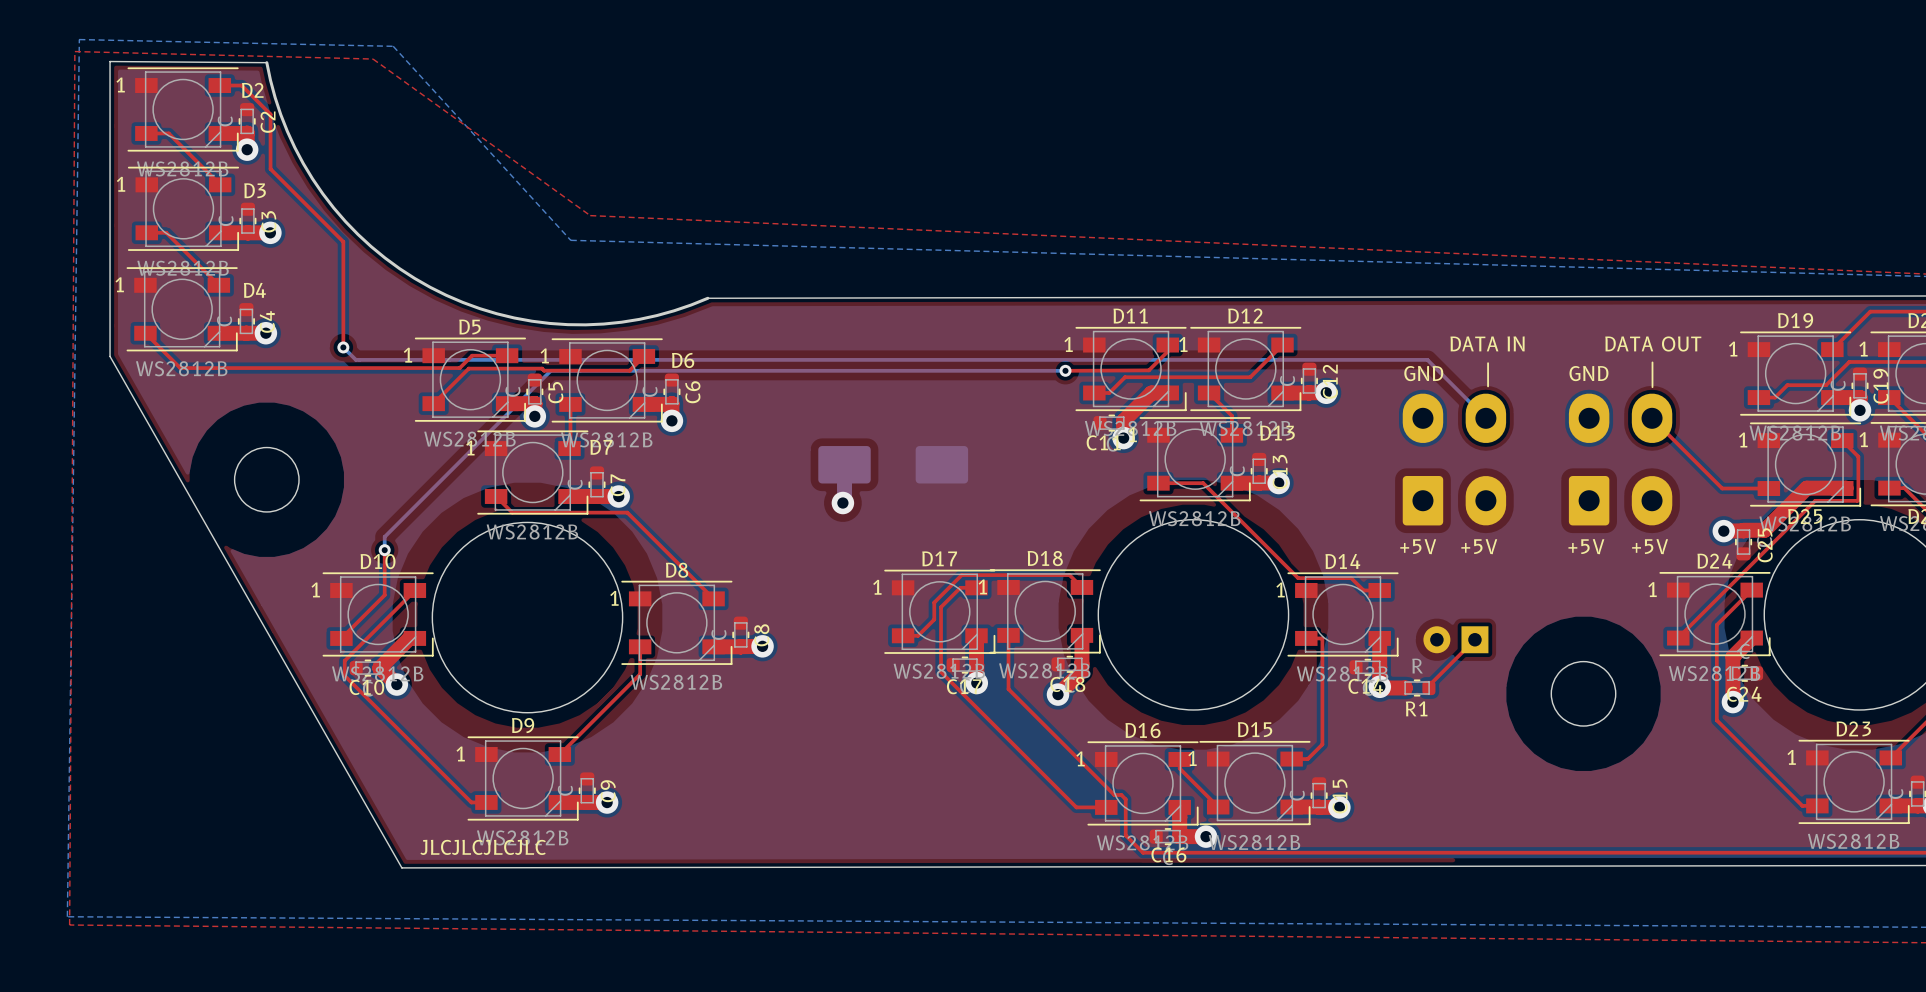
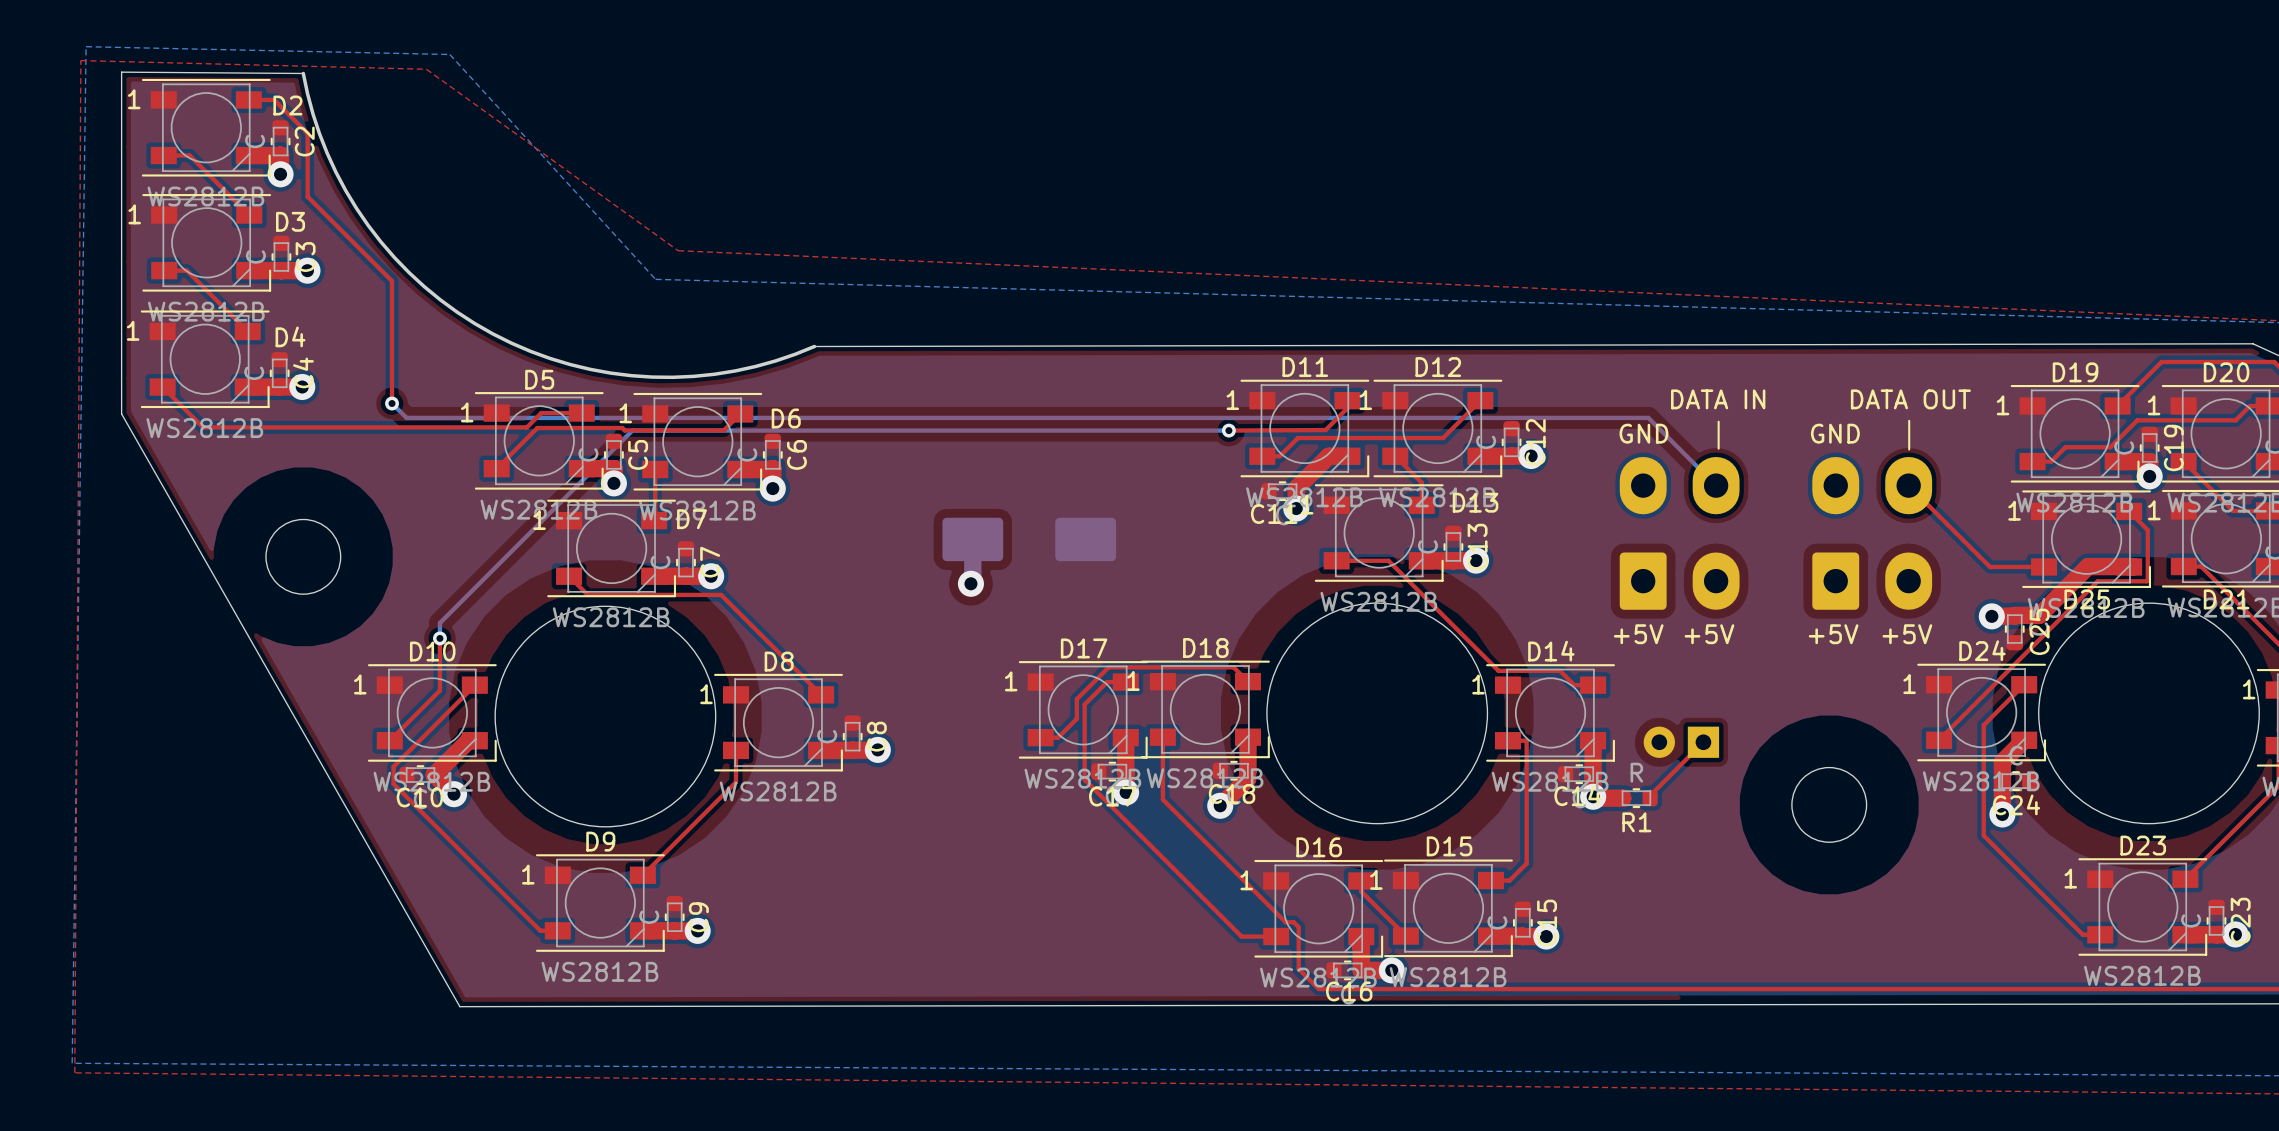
text: JLCJLCJLCJLC (483, 847) -> none

